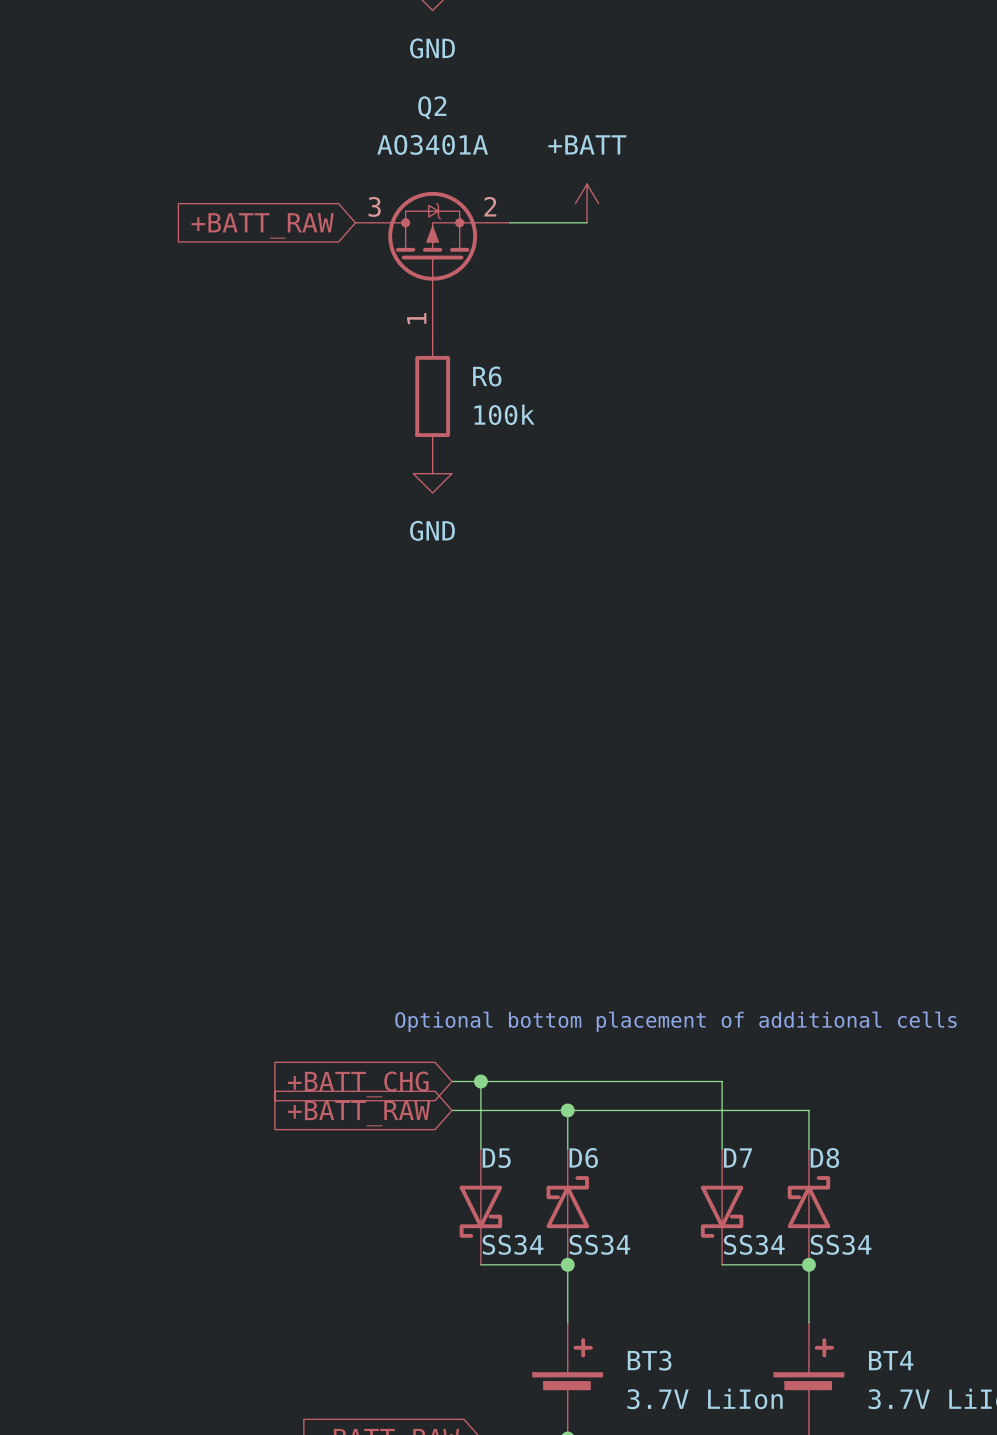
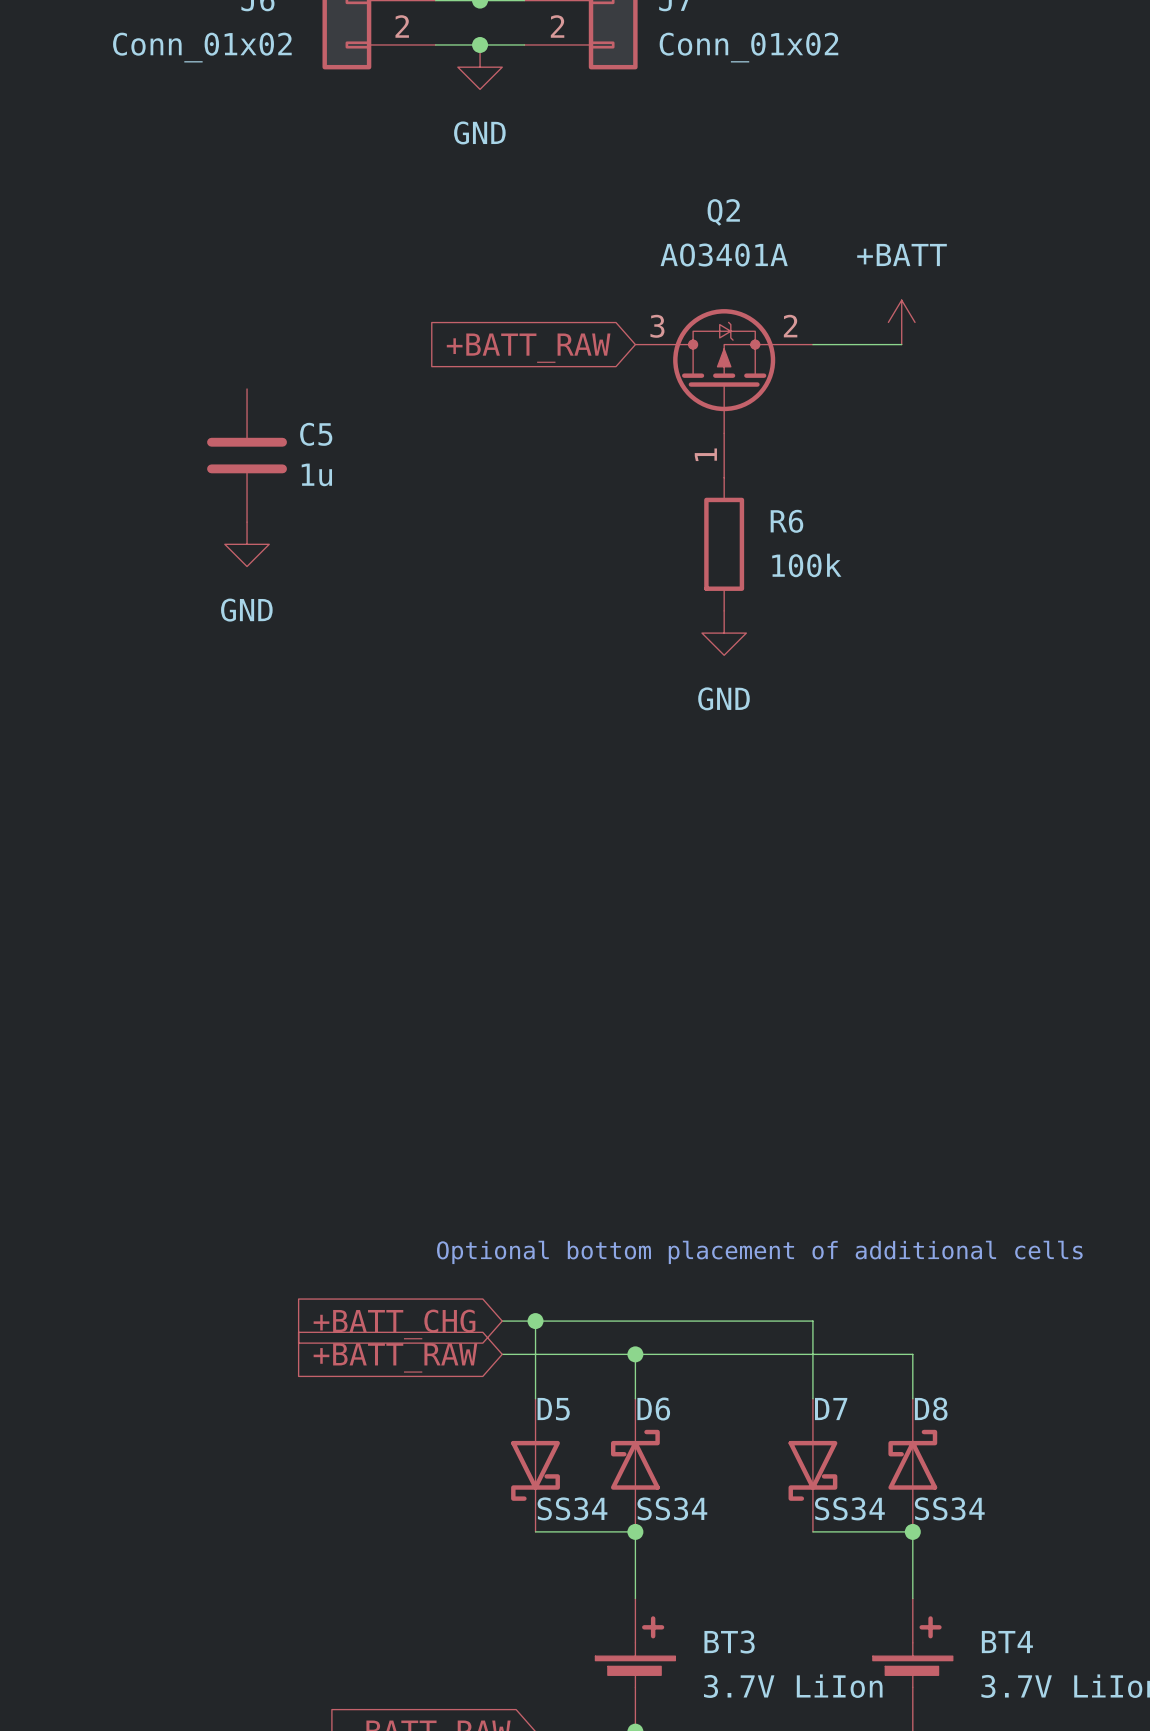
power symbol position: +BATT (587, 203) -> +BATT (901, 322)
wire: (509, 222) (587, 222) -> (812, 344) (901, 344)
global label position: +BATT_RAW (262, 225) -> +BATT_RAW (528, 348)
Q2 position: (432, 265) -> (724, 393)
C5: none -> 1u (247, 455)
R6 position: (432, 396) -> (724, 544)
power symbol: none -> GND (247, 544)
power symbol: GND (432, 473) -> none
power symbol: none -> GND (724, 633)

